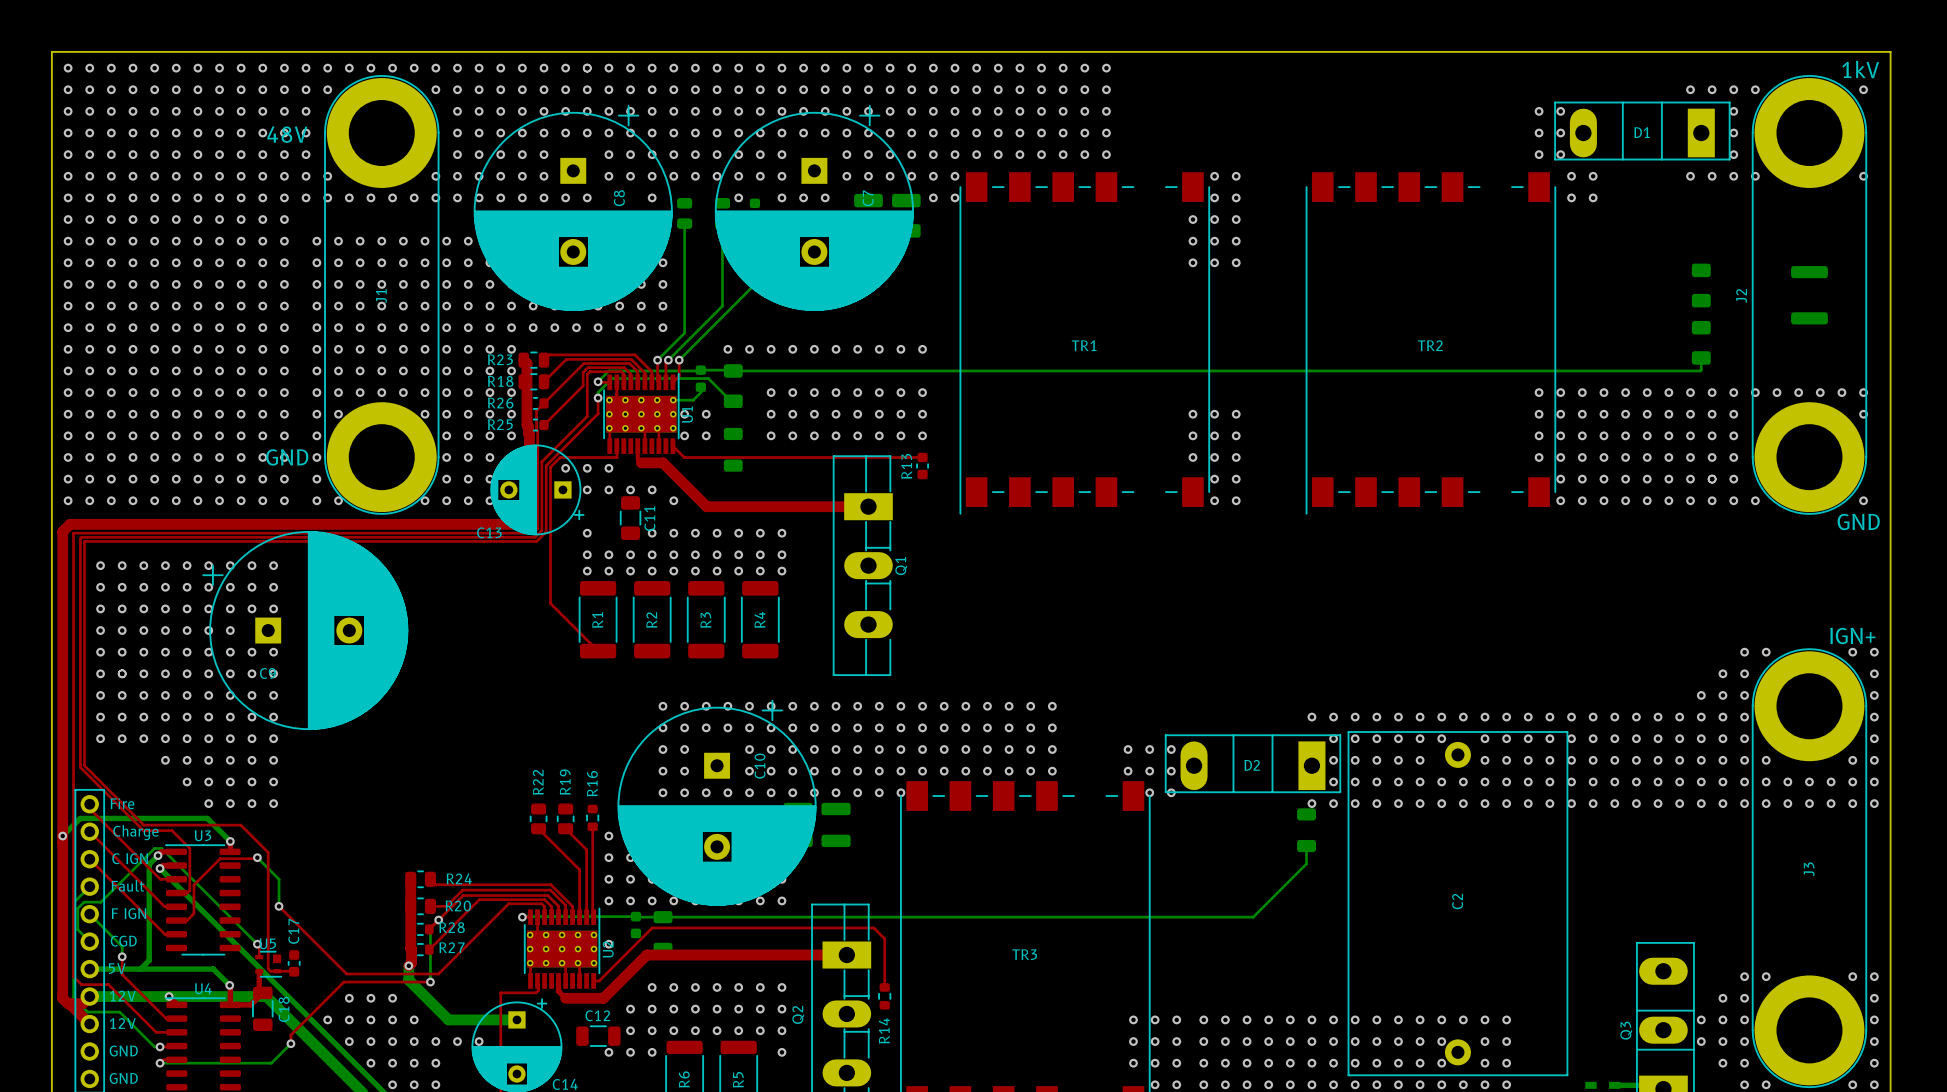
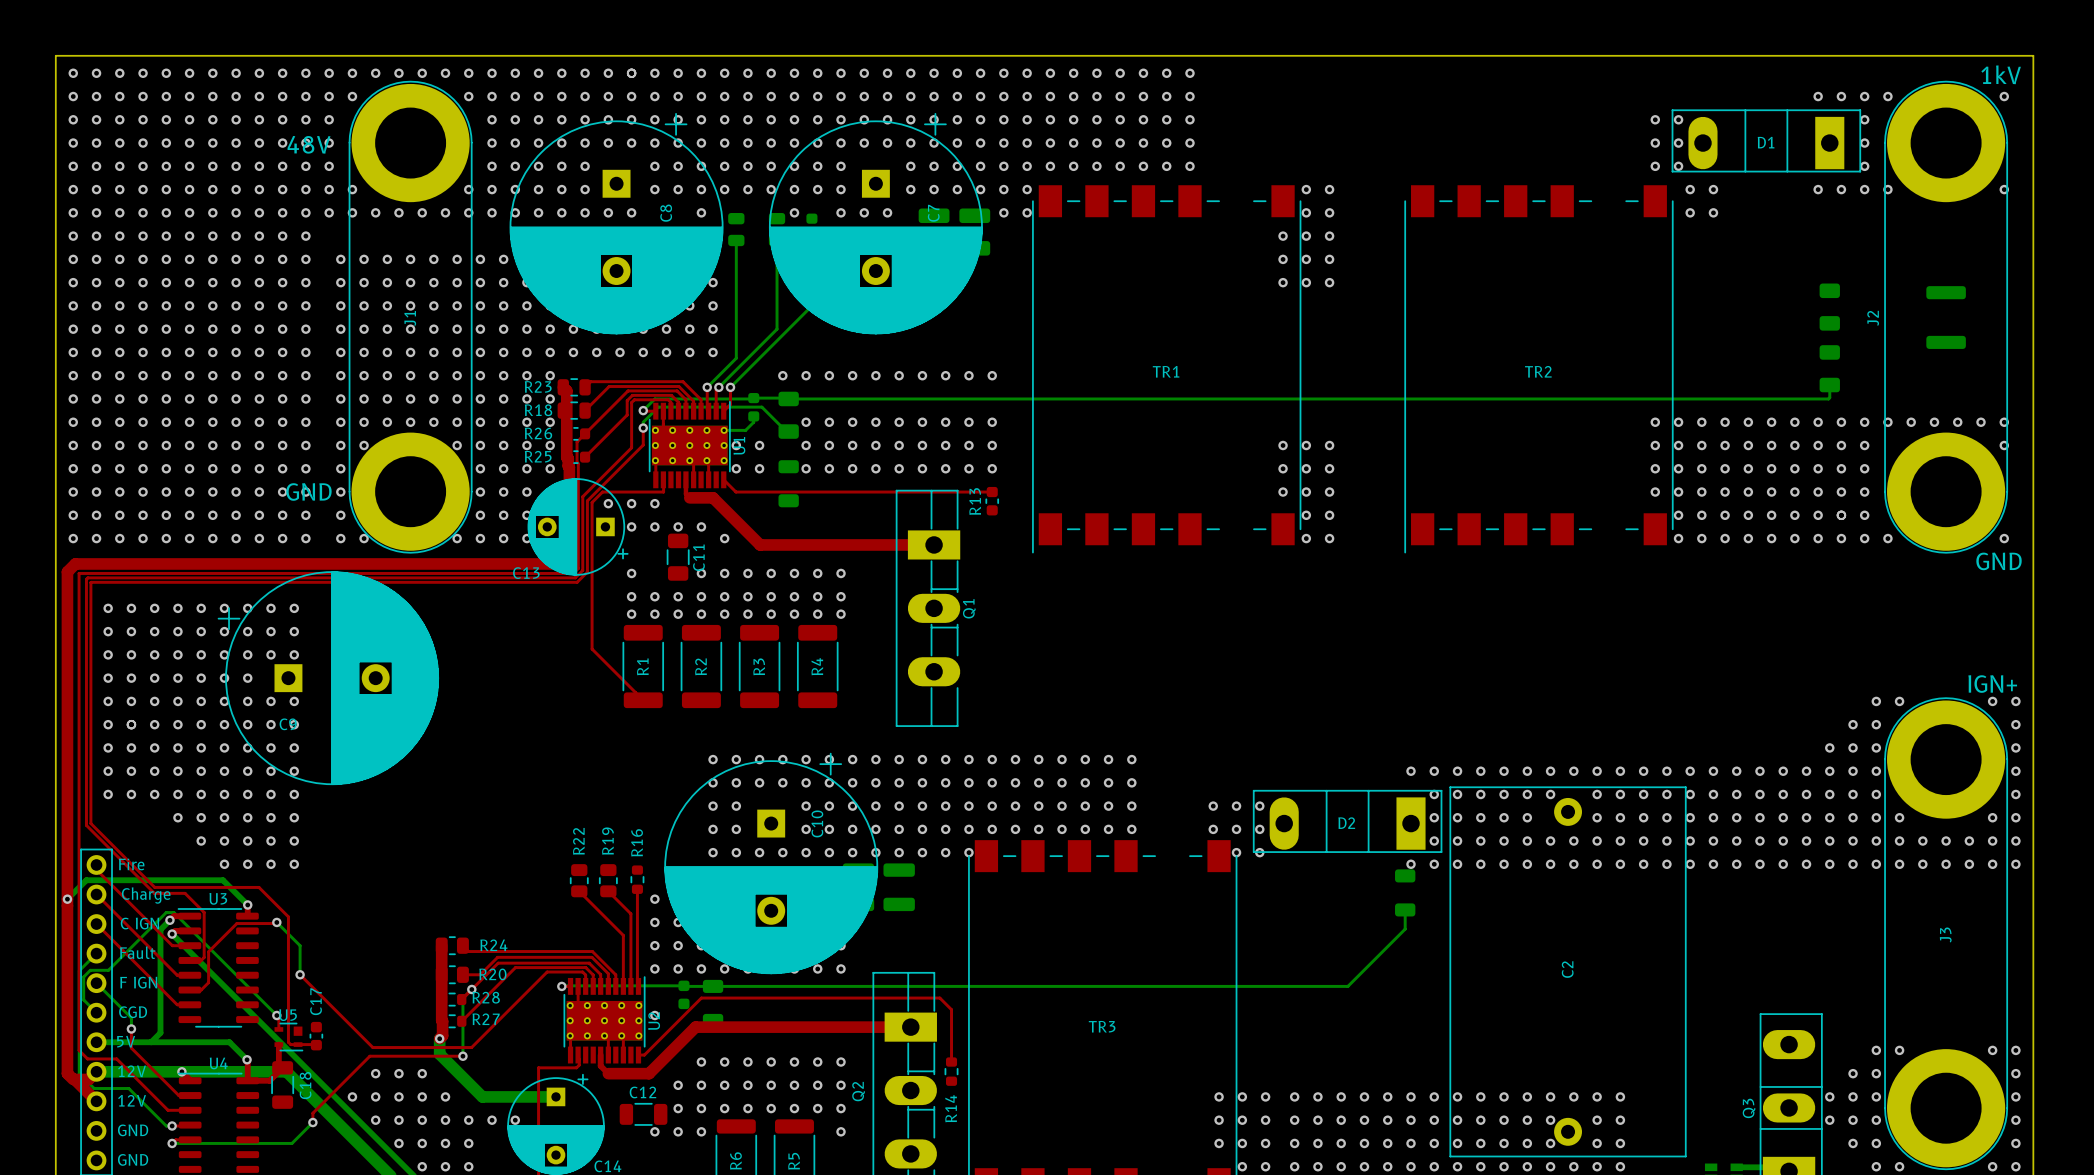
via: none -> (806, 422)
via: none -> (806, 445)
via: none -> (806, 468)

